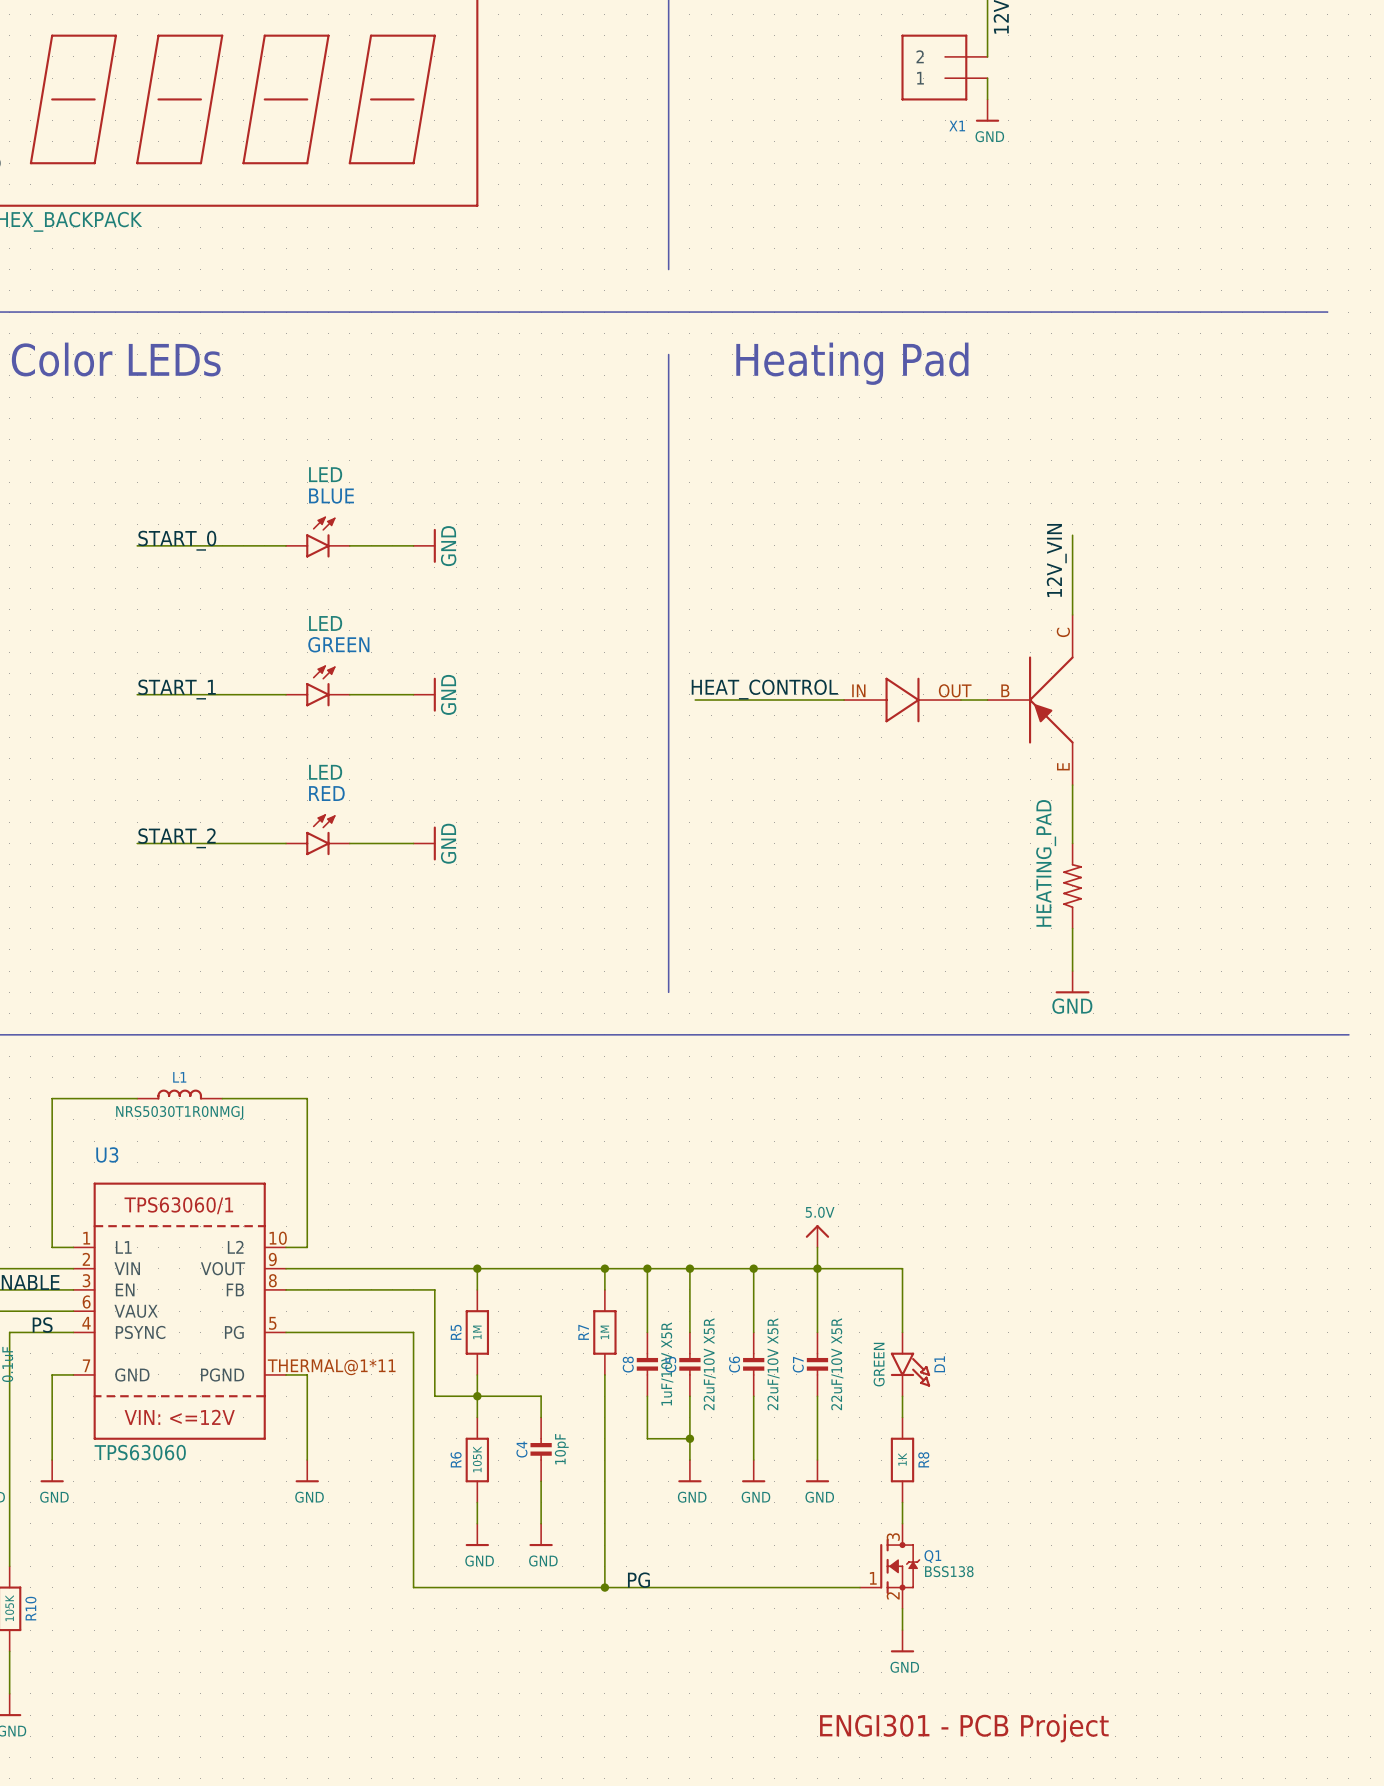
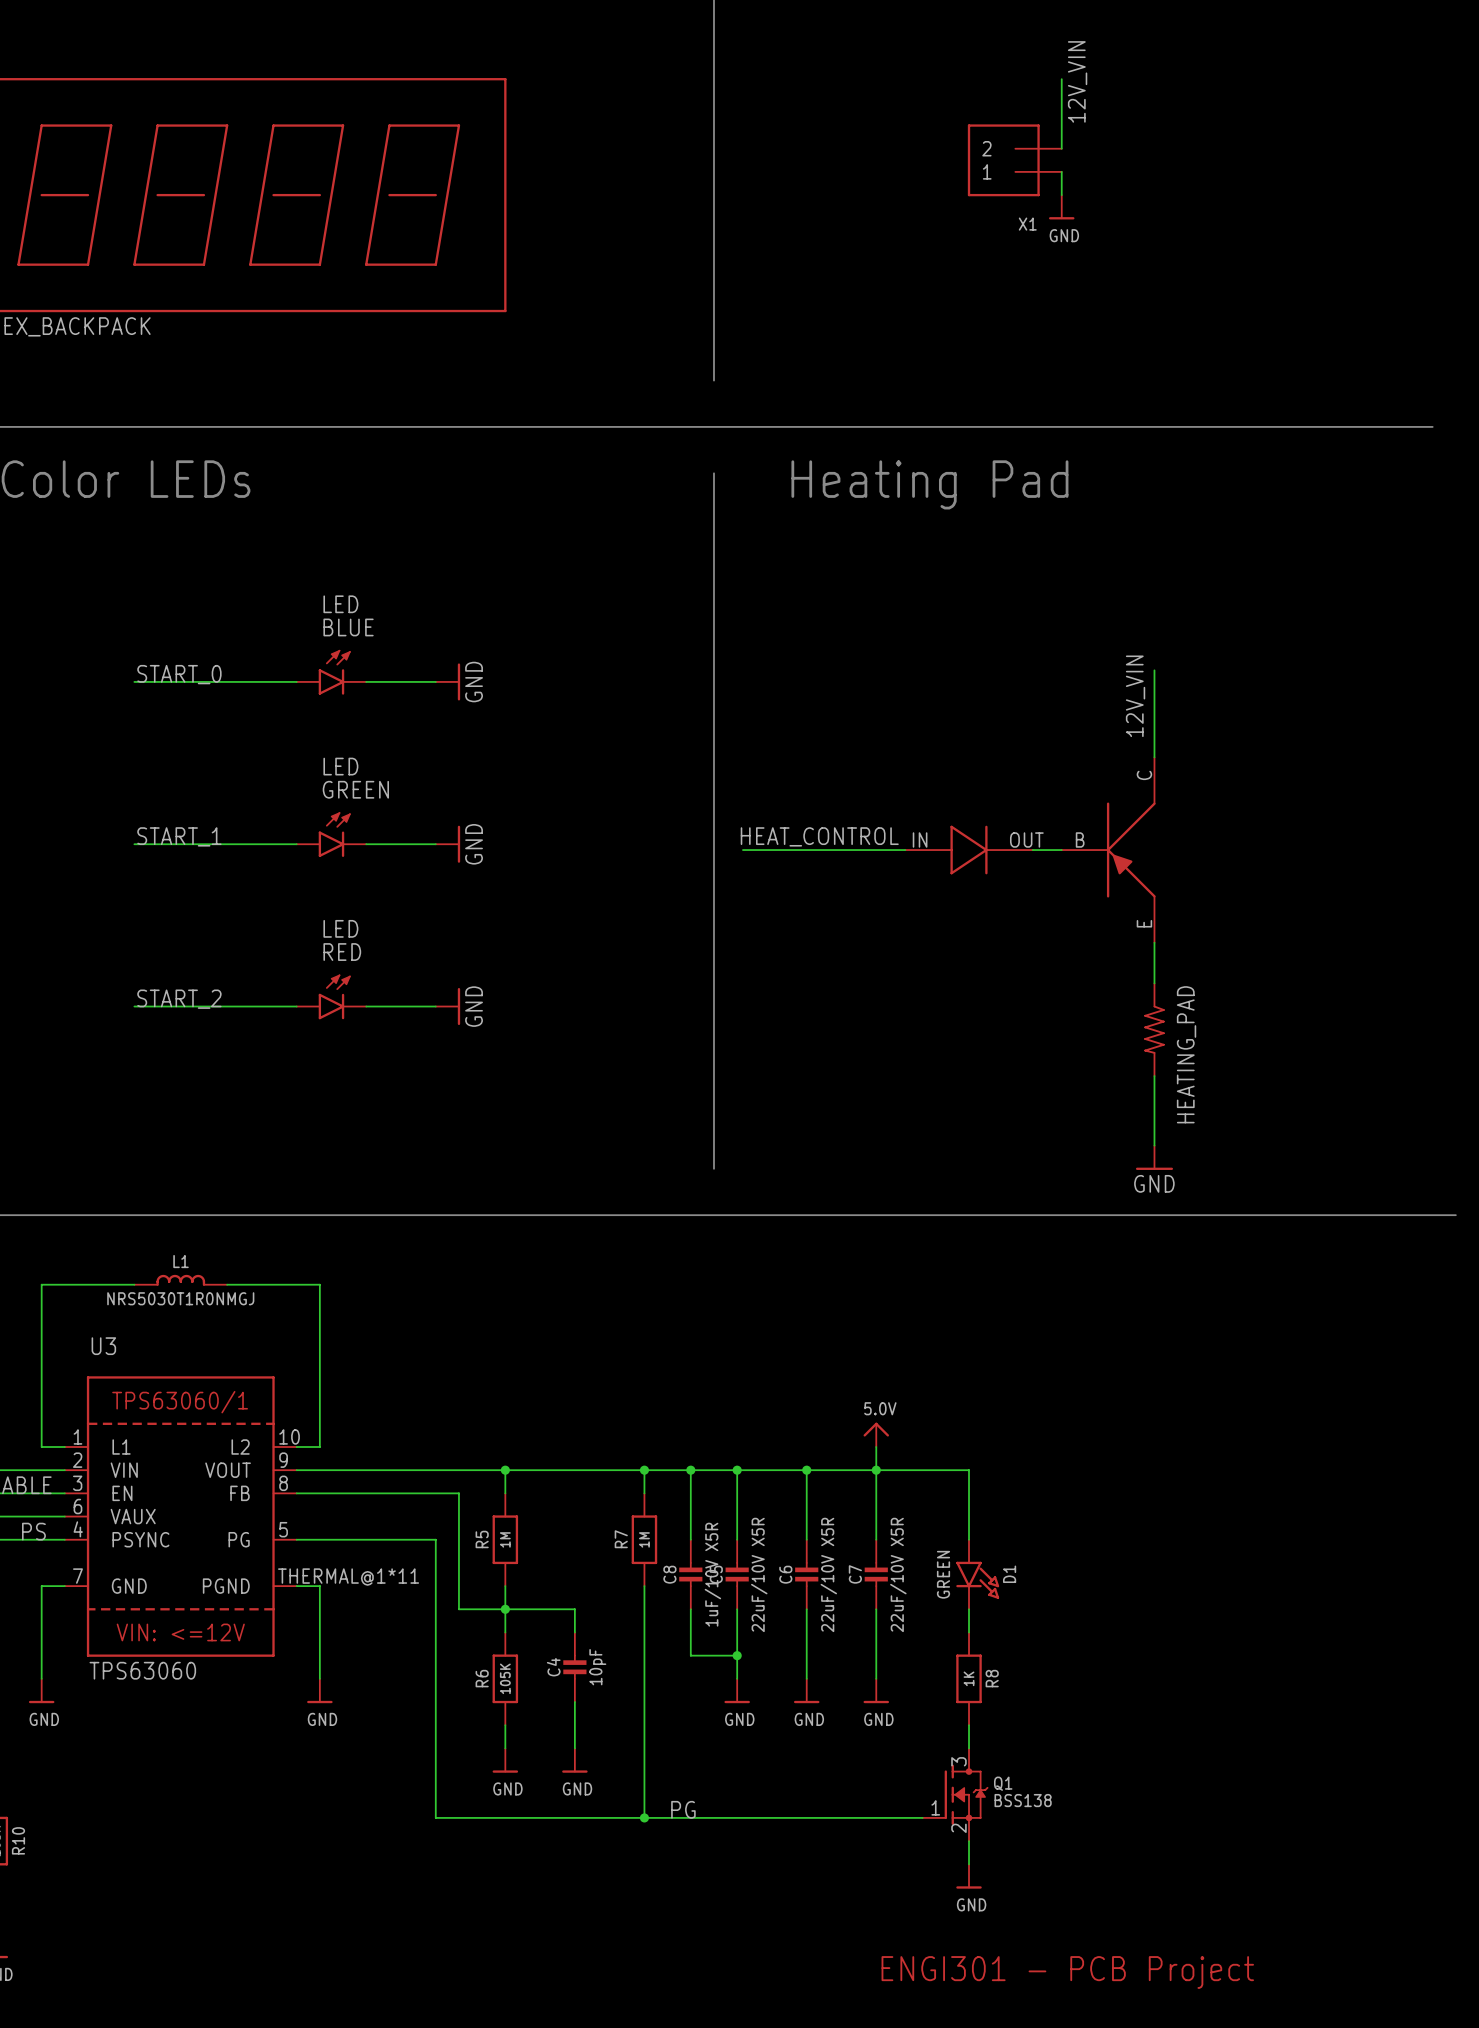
part rotation: 0° (1072, 886) -> 180° (1154, 1029)

